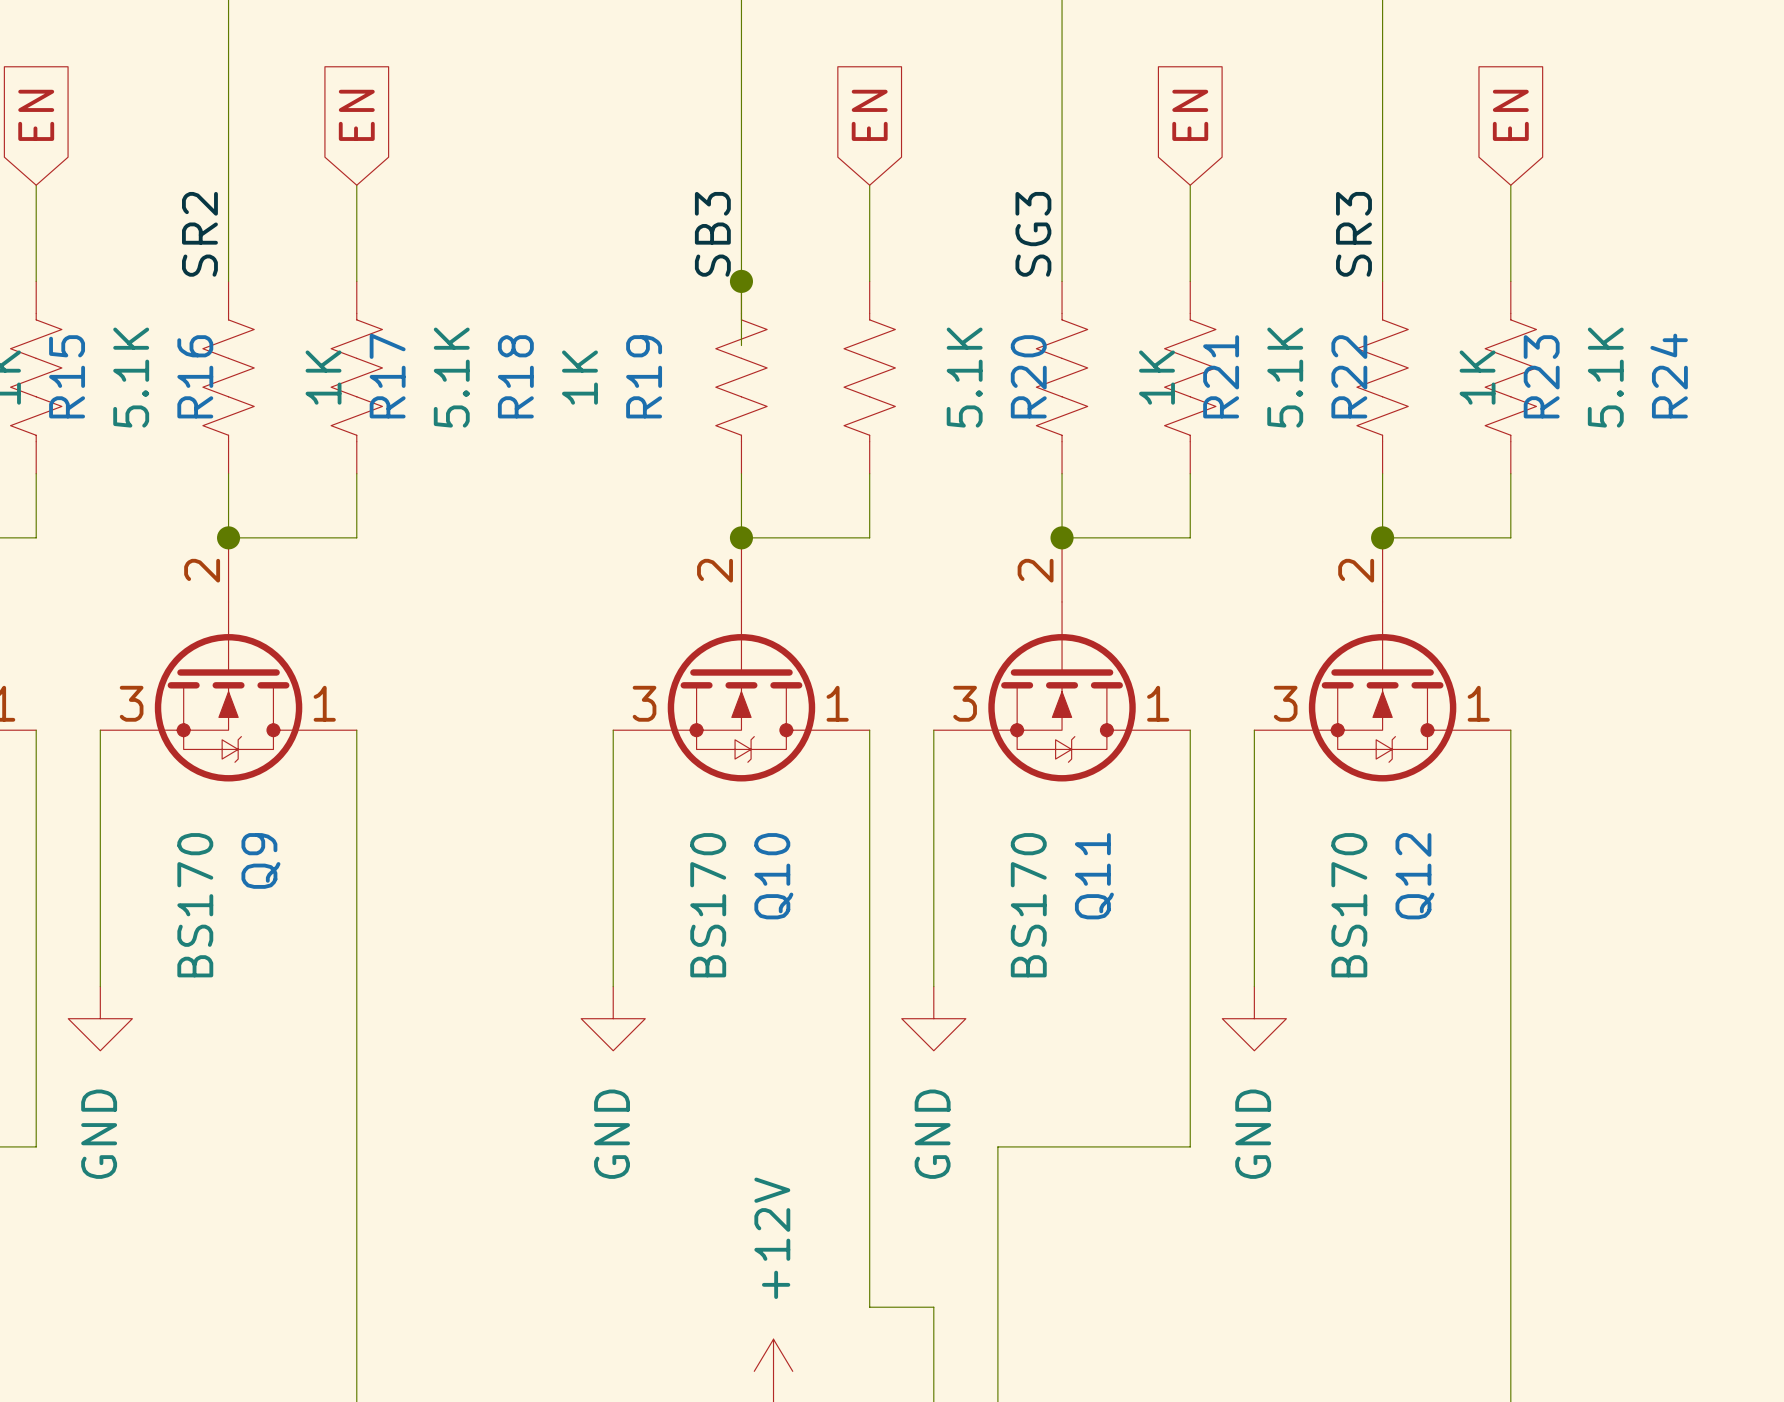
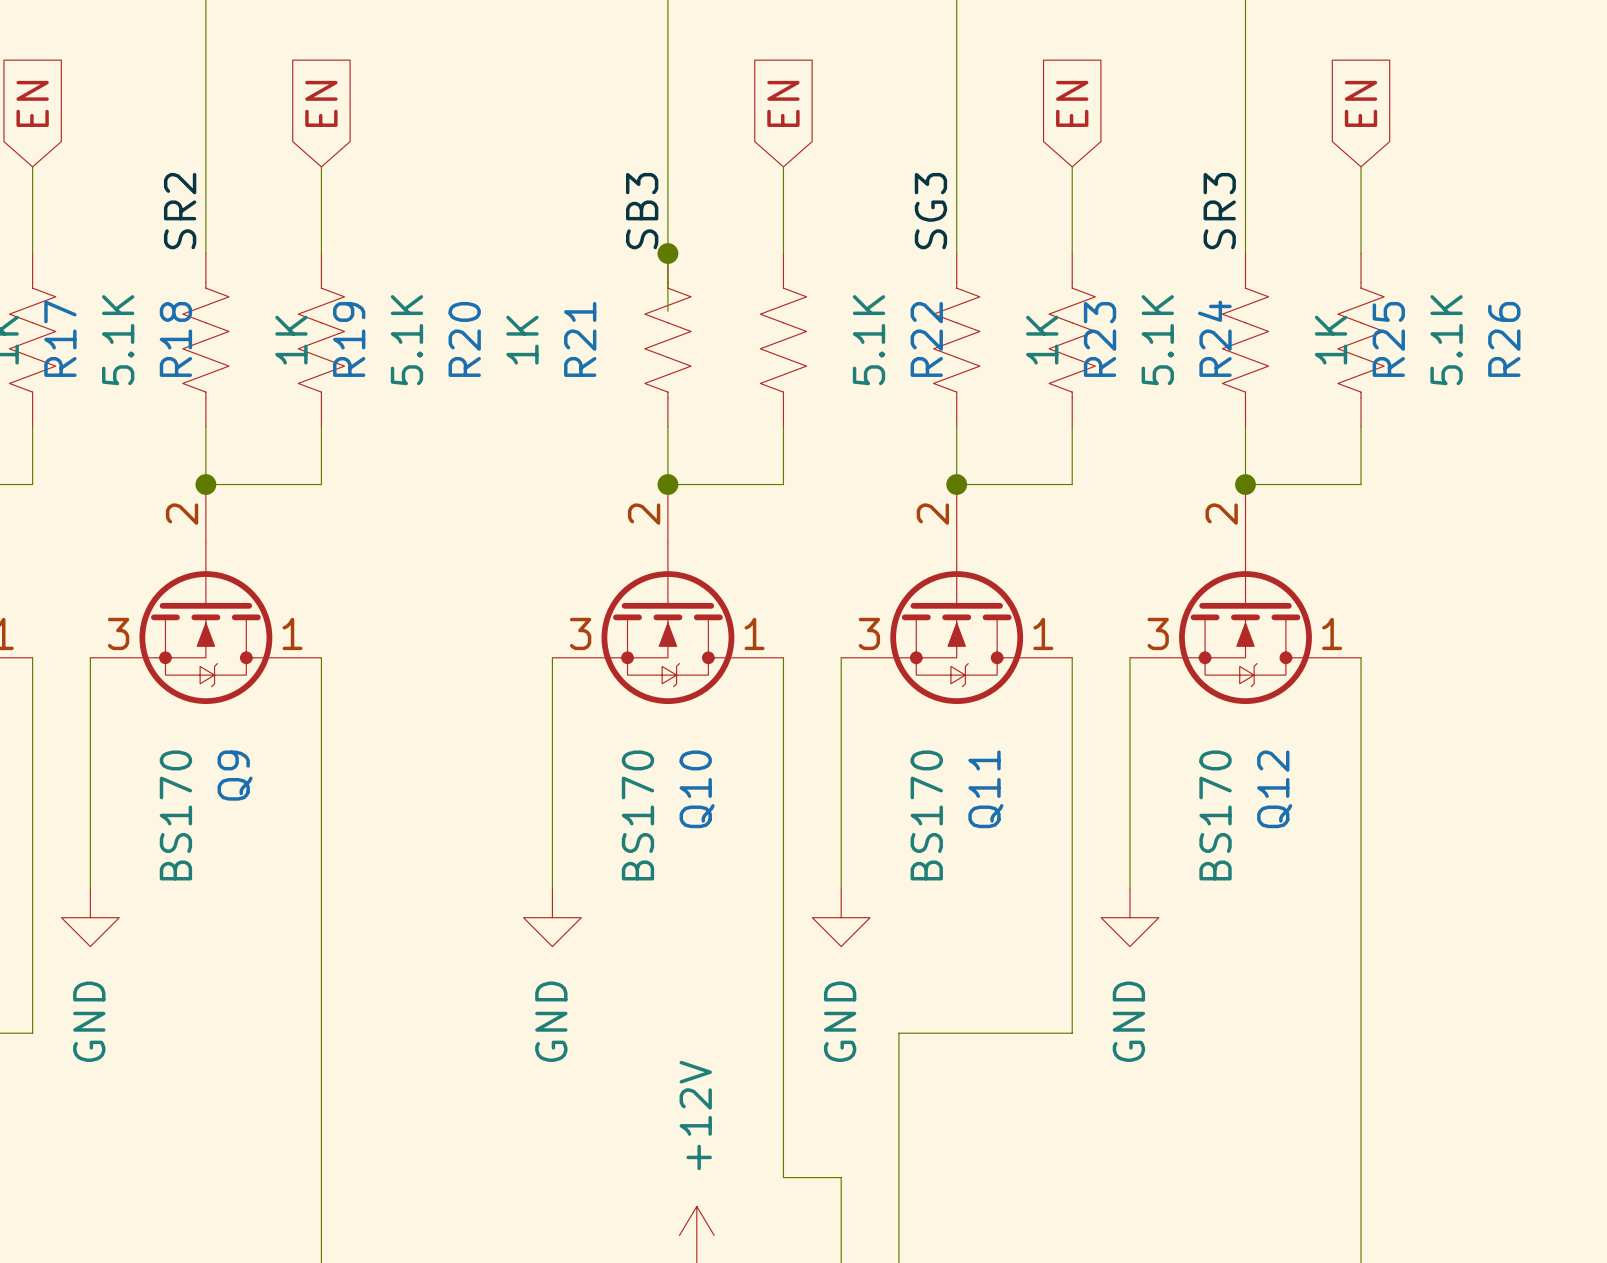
R15 name: R15 (67, 376) -> R17 (60, 338)
R16 name: R16 (195, 376) -> R18 (175, 339)
R17 name: R17 (387, 376) -> R19 (349, 339)
R18 name: R18 (515, 376) -> R20 (464, 339)
R19 name: R19 (644, 376) -> R21 (580, 339)
R20 name: R20 (1028, 376) -> R22 (926, 339)
R21 name: R21 (1221, 376) -> R23 (1100, 339)
R22 name: R22 (1349, 376) -> R24 (1214, 338)
R23 name: R23 (1541, 376) -> R25 (1388, 339)
R24 name: R24 (1669, 376) -> R26 (1504, 339)

